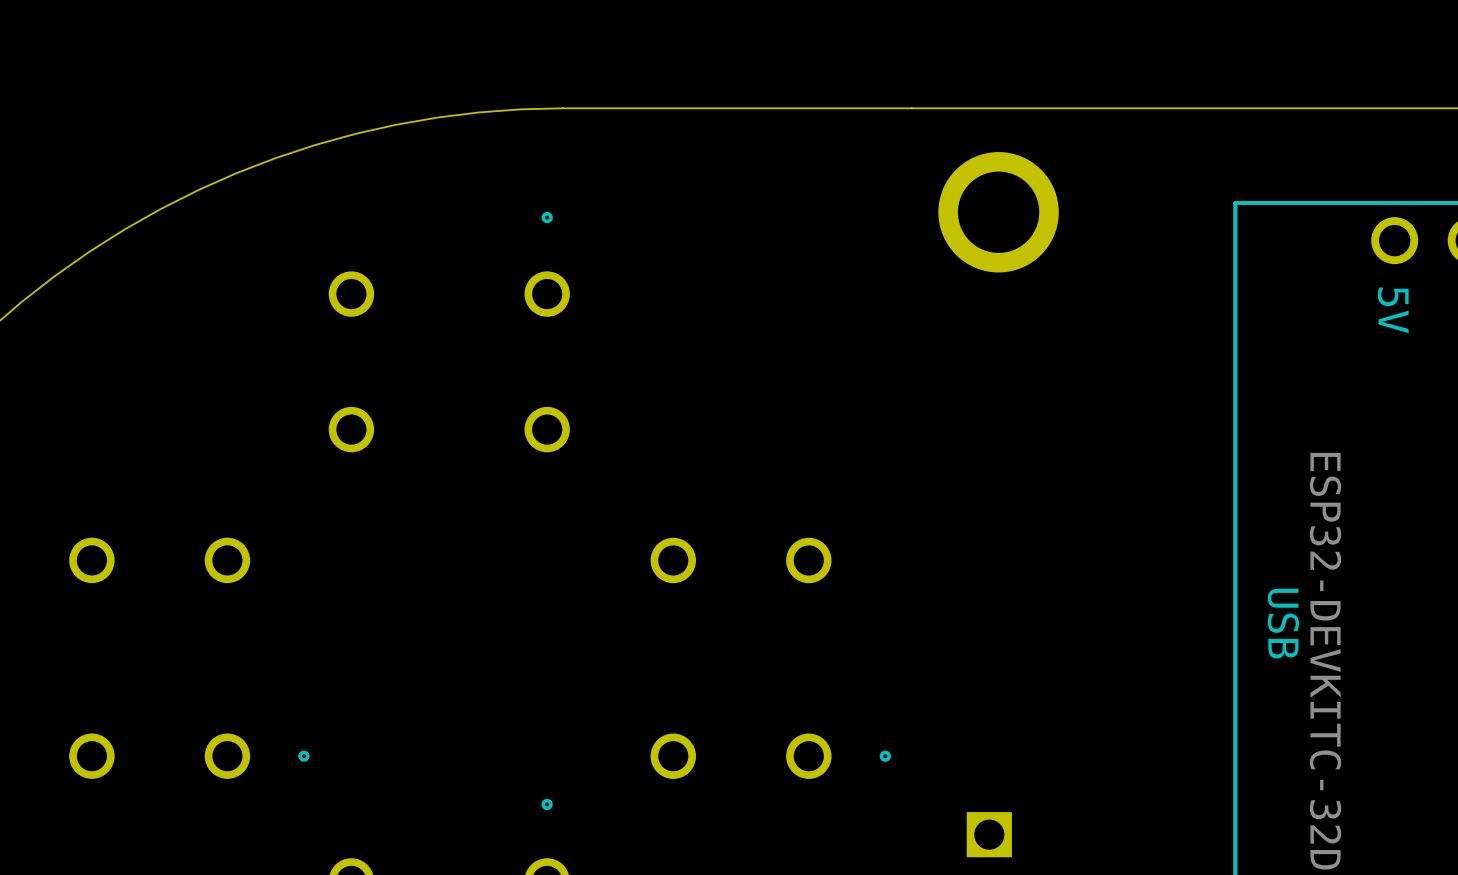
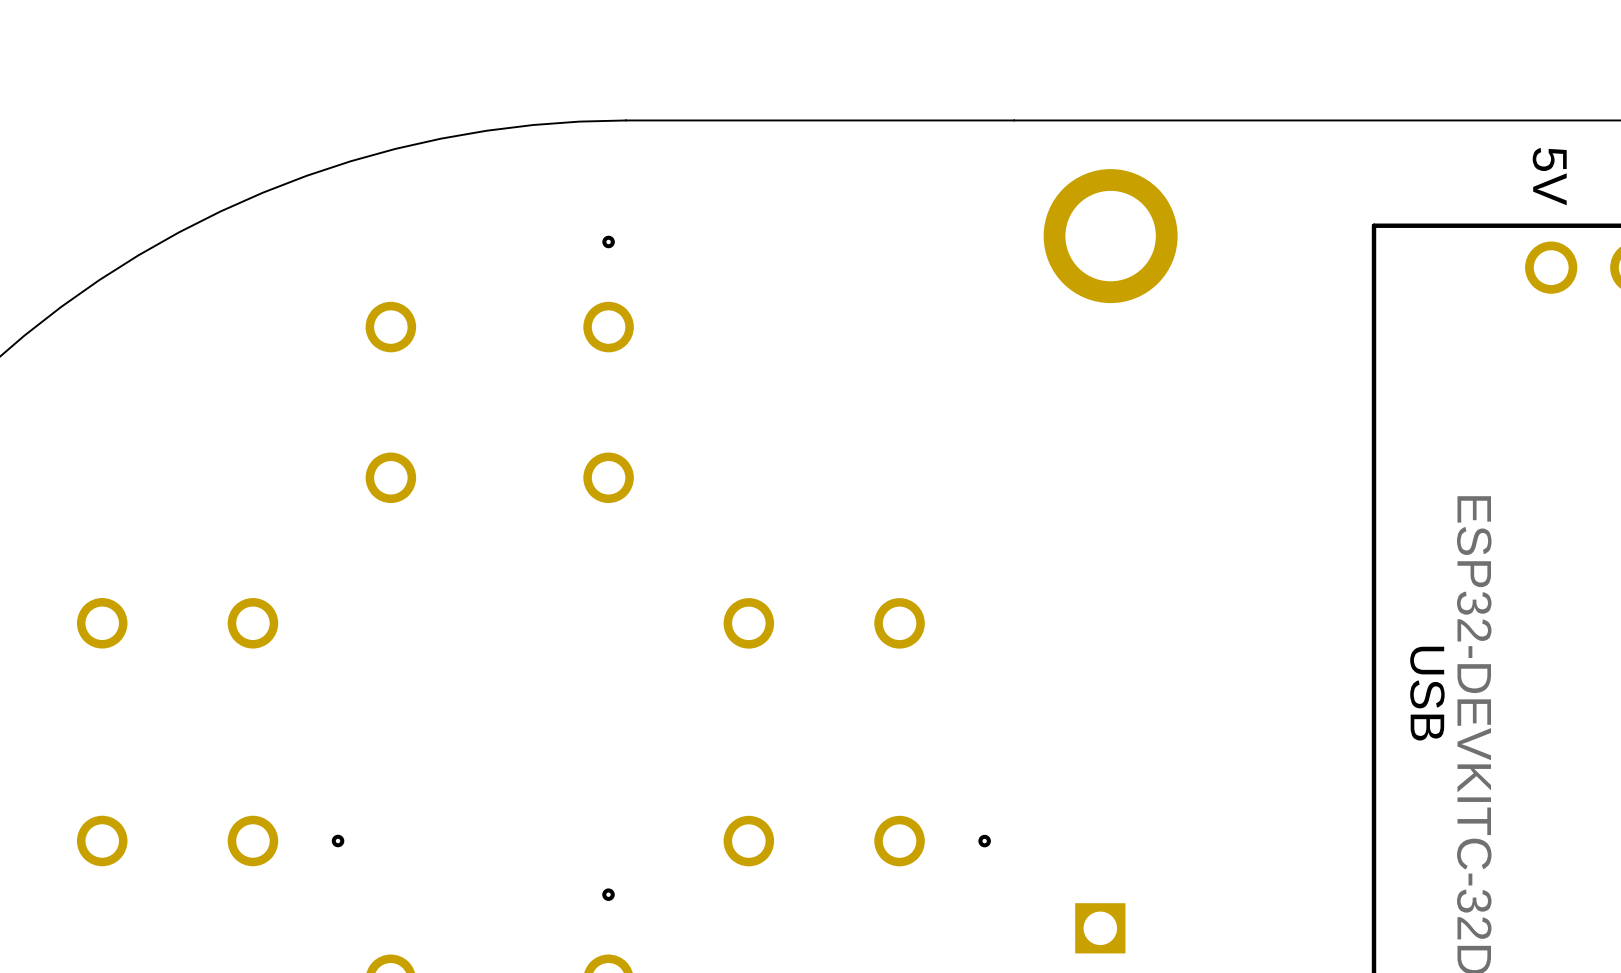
part text position: 5V (1393, 310) -> 5V (1549, 176)

